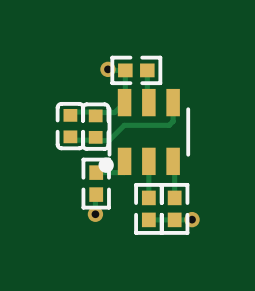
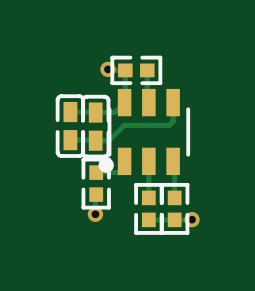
part footprint: [55, 101, 86, 151] -> [55, 94, 86, 158]
part footprint: [81, 102, 111, 151] -> [81, 94, 111, 159]

